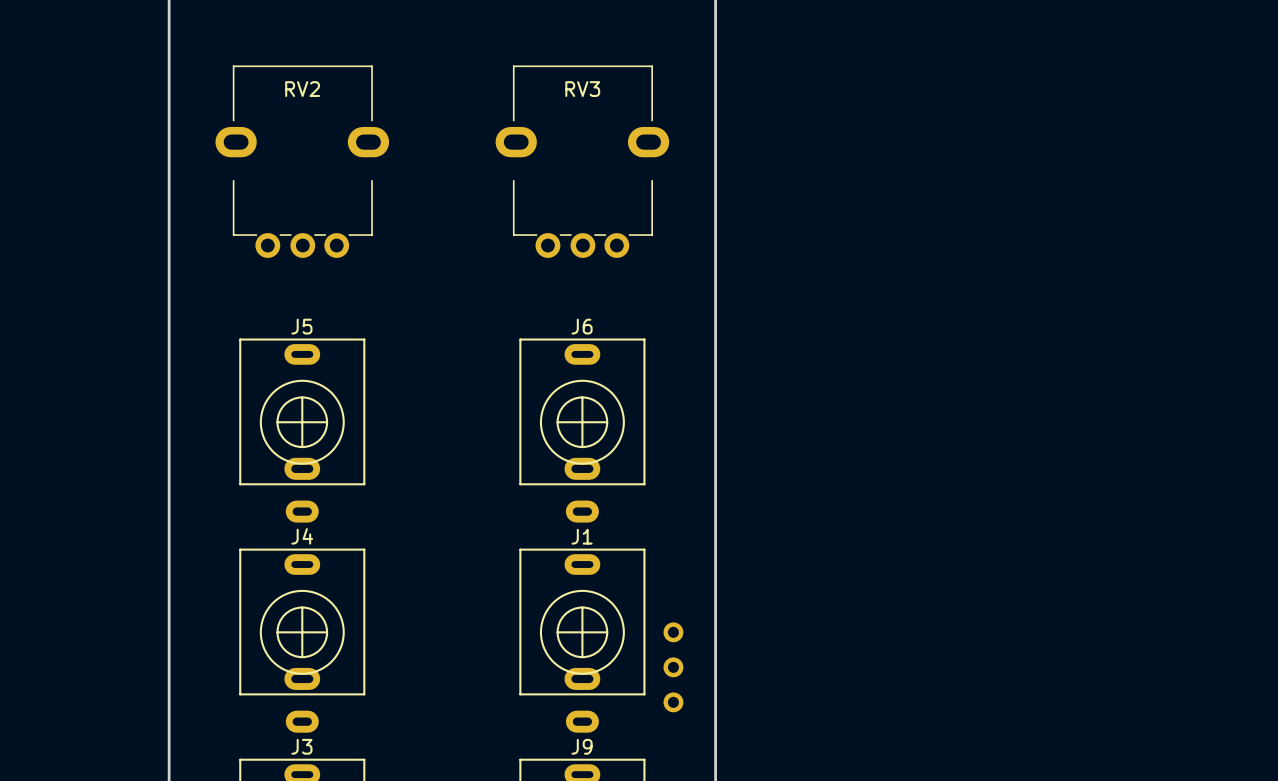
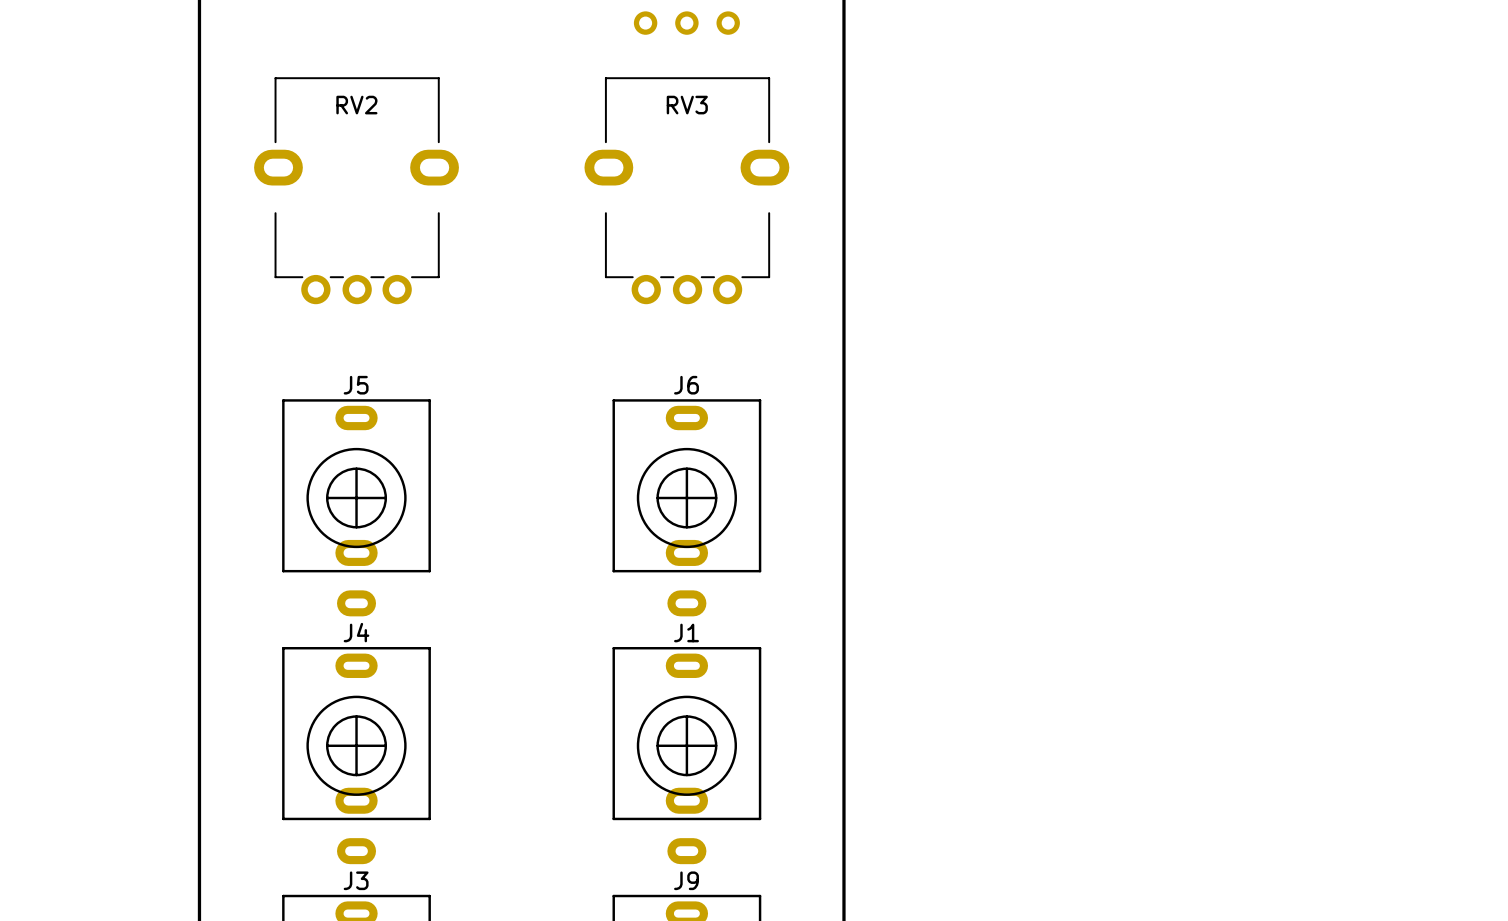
part: none -> (686, 23)
part: (673, 667) -> none

